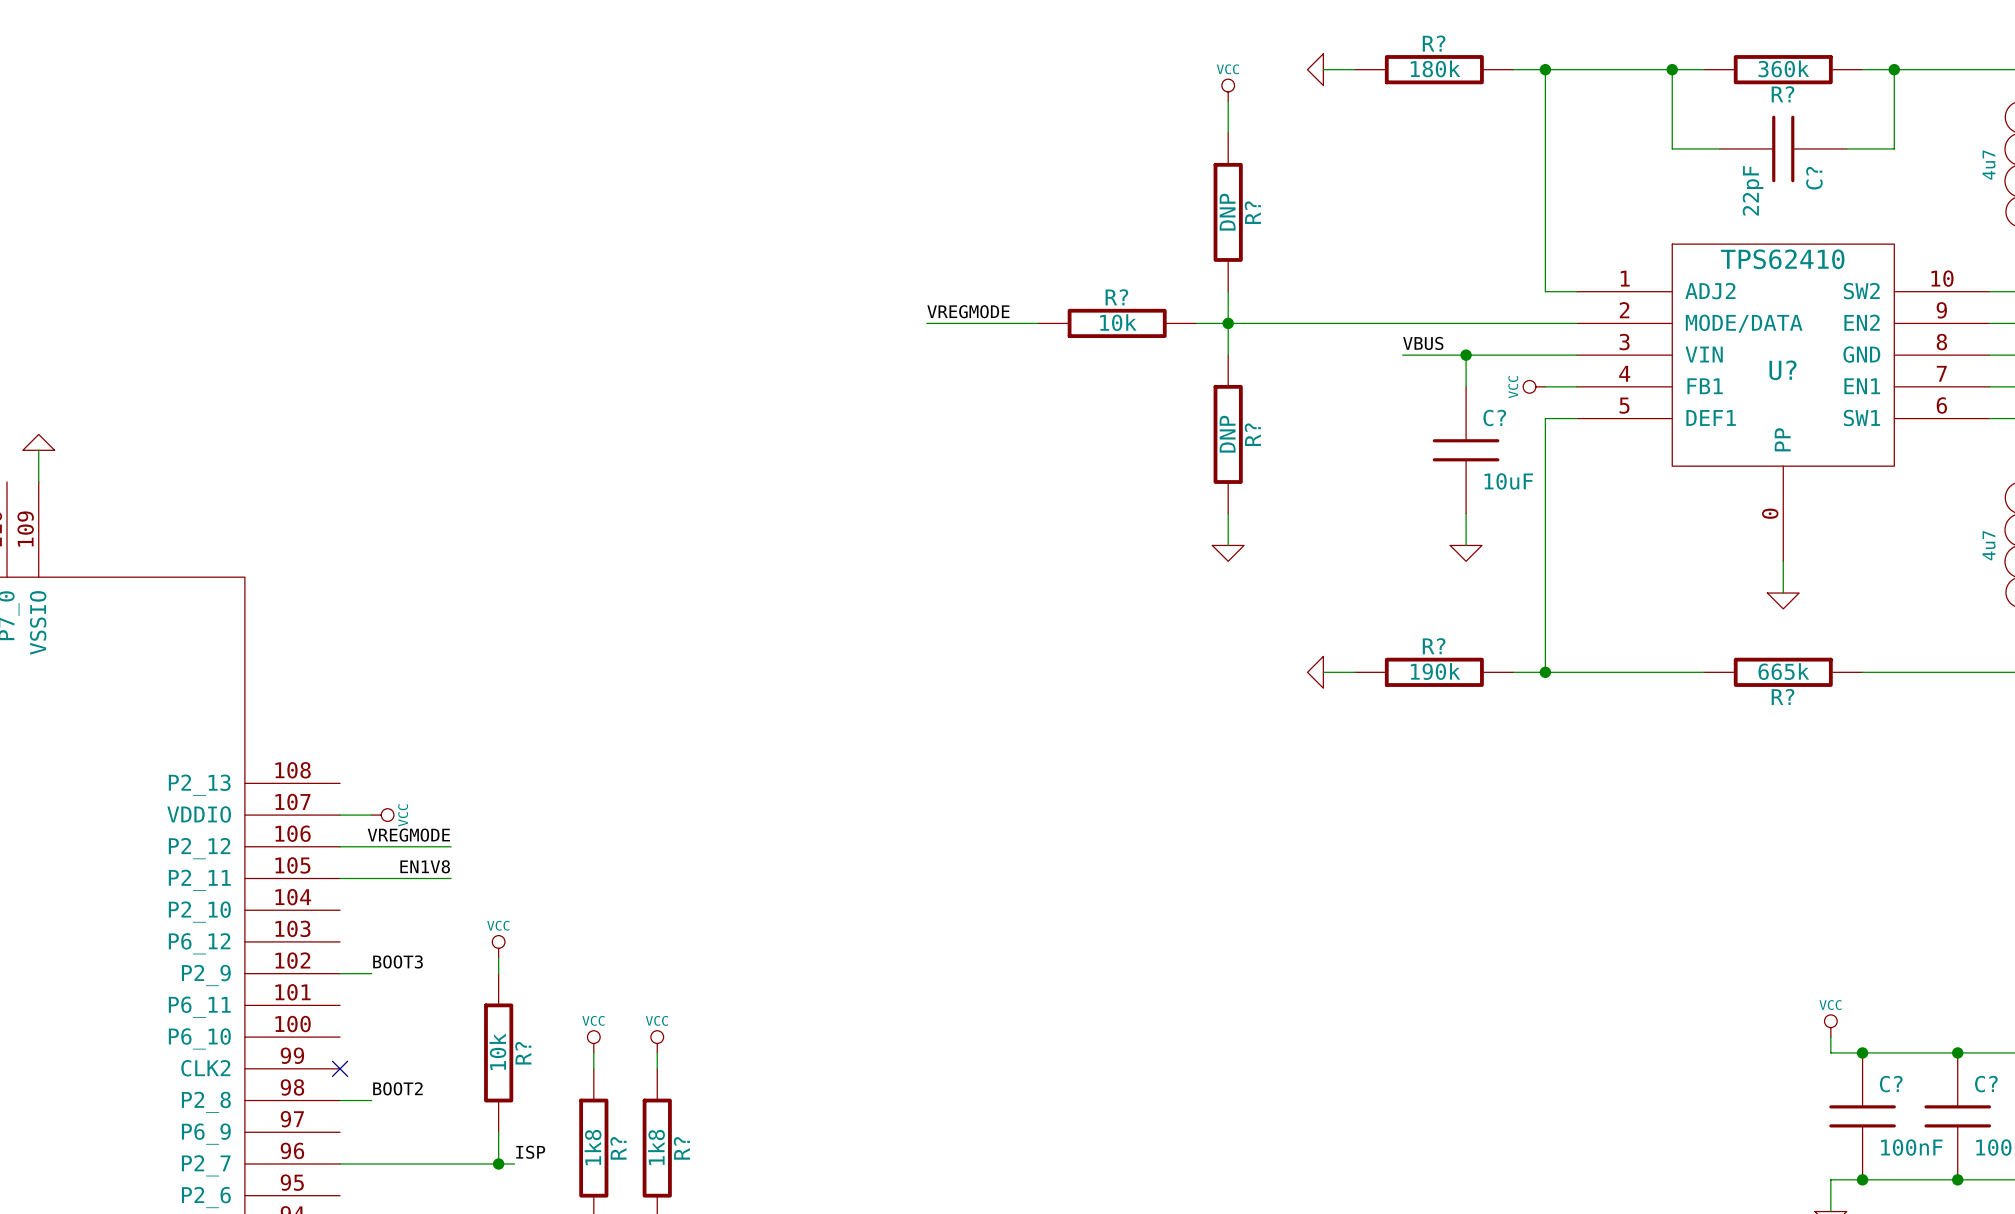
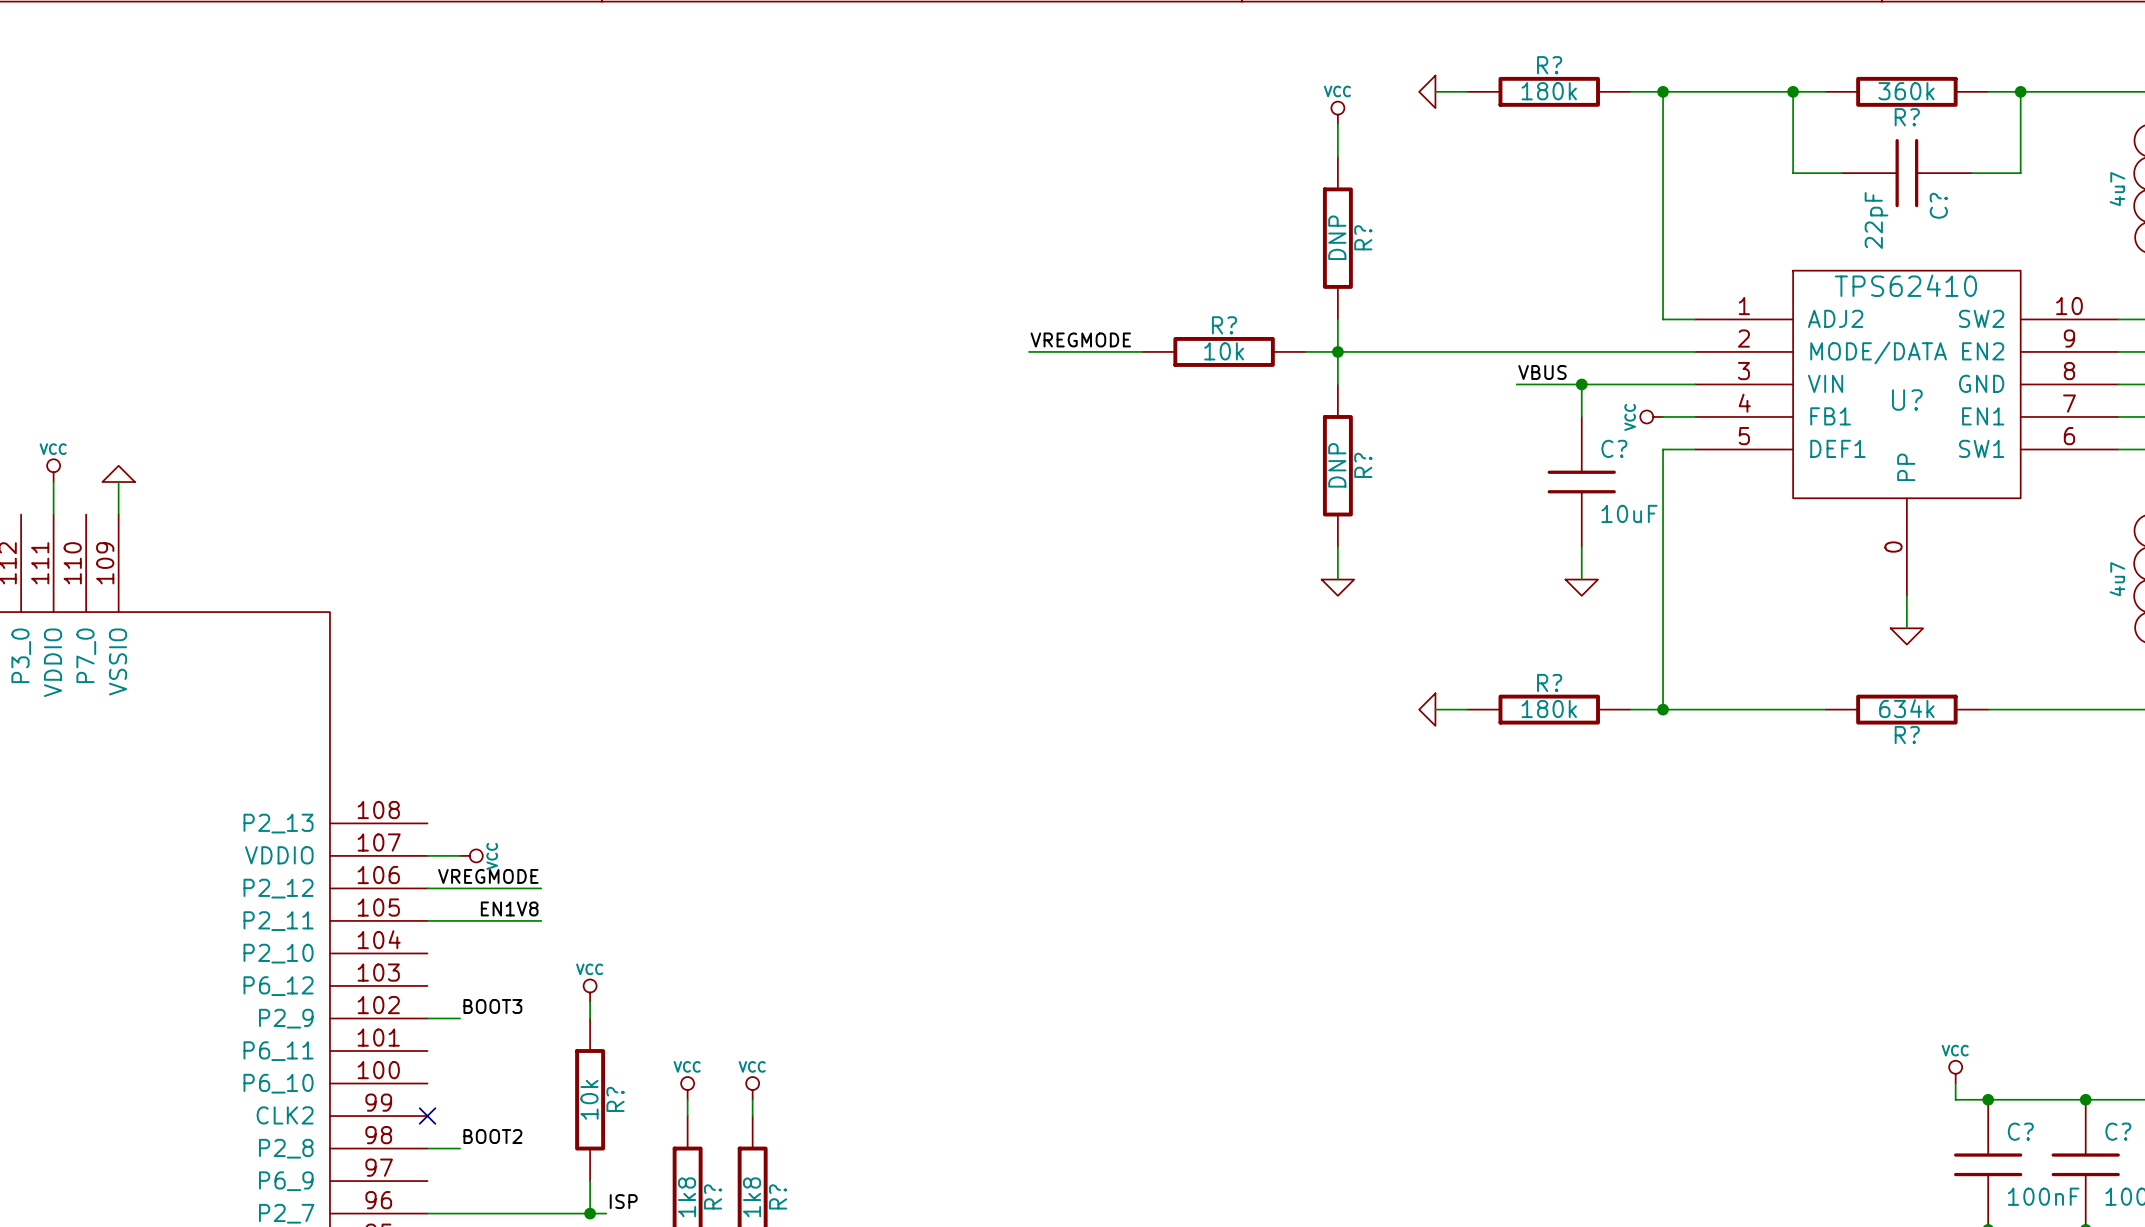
R? value: 190k (1435, 671) -> 180k (1549, 709)
R? value: 665k (1783, 671) -> 634k (1906, 708)

